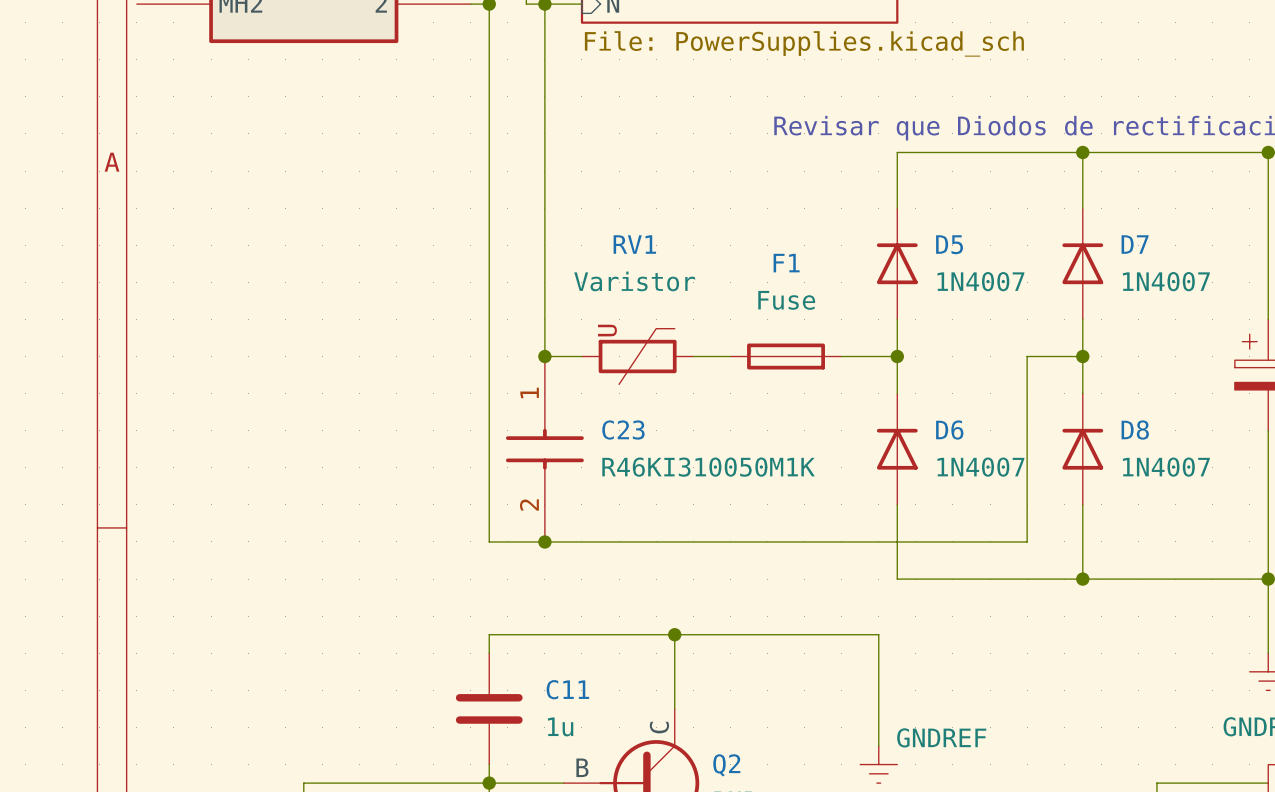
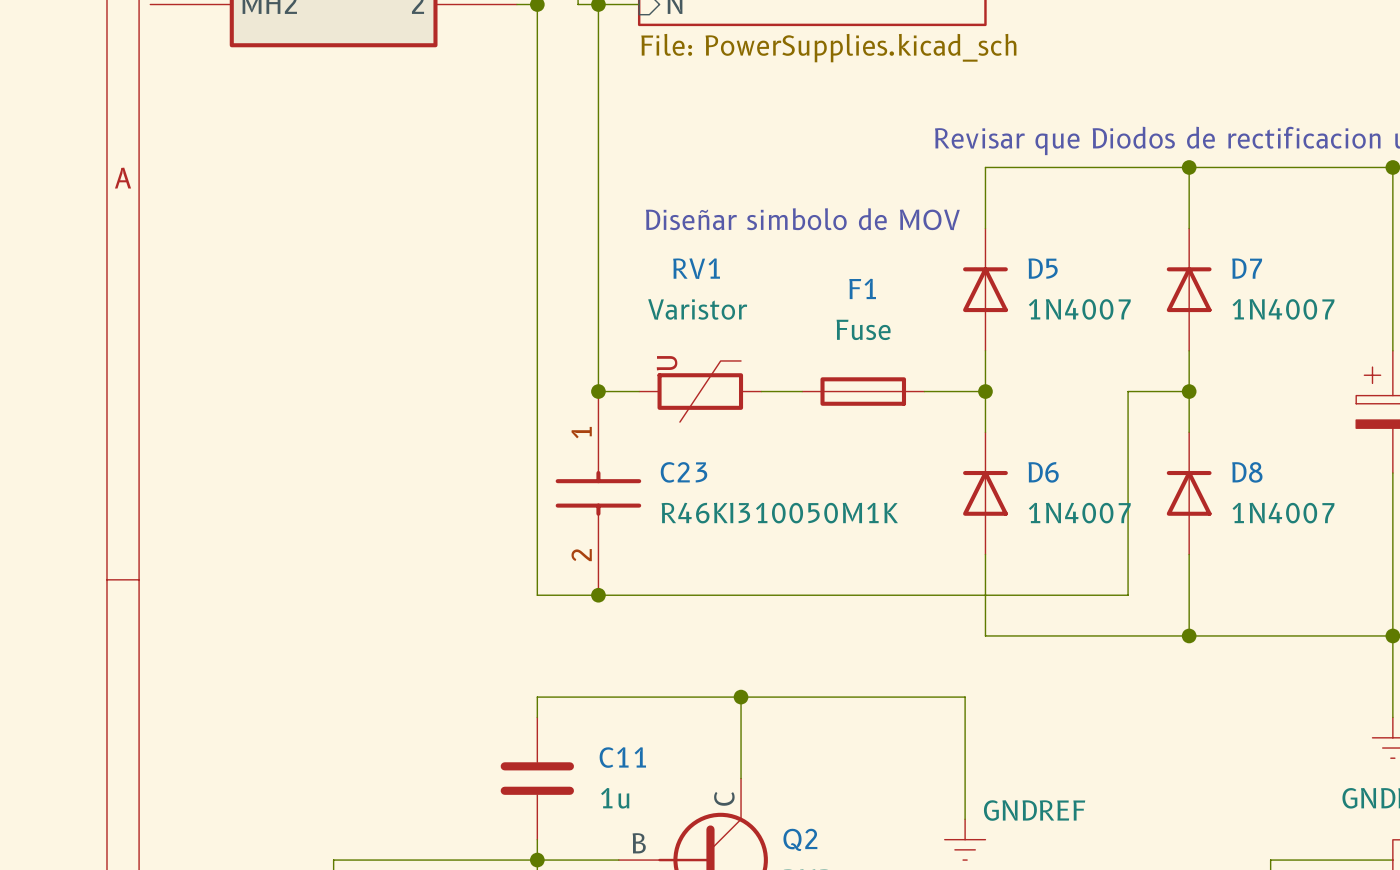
text: none -> Diseñar simbolo de MOV (802, 219)

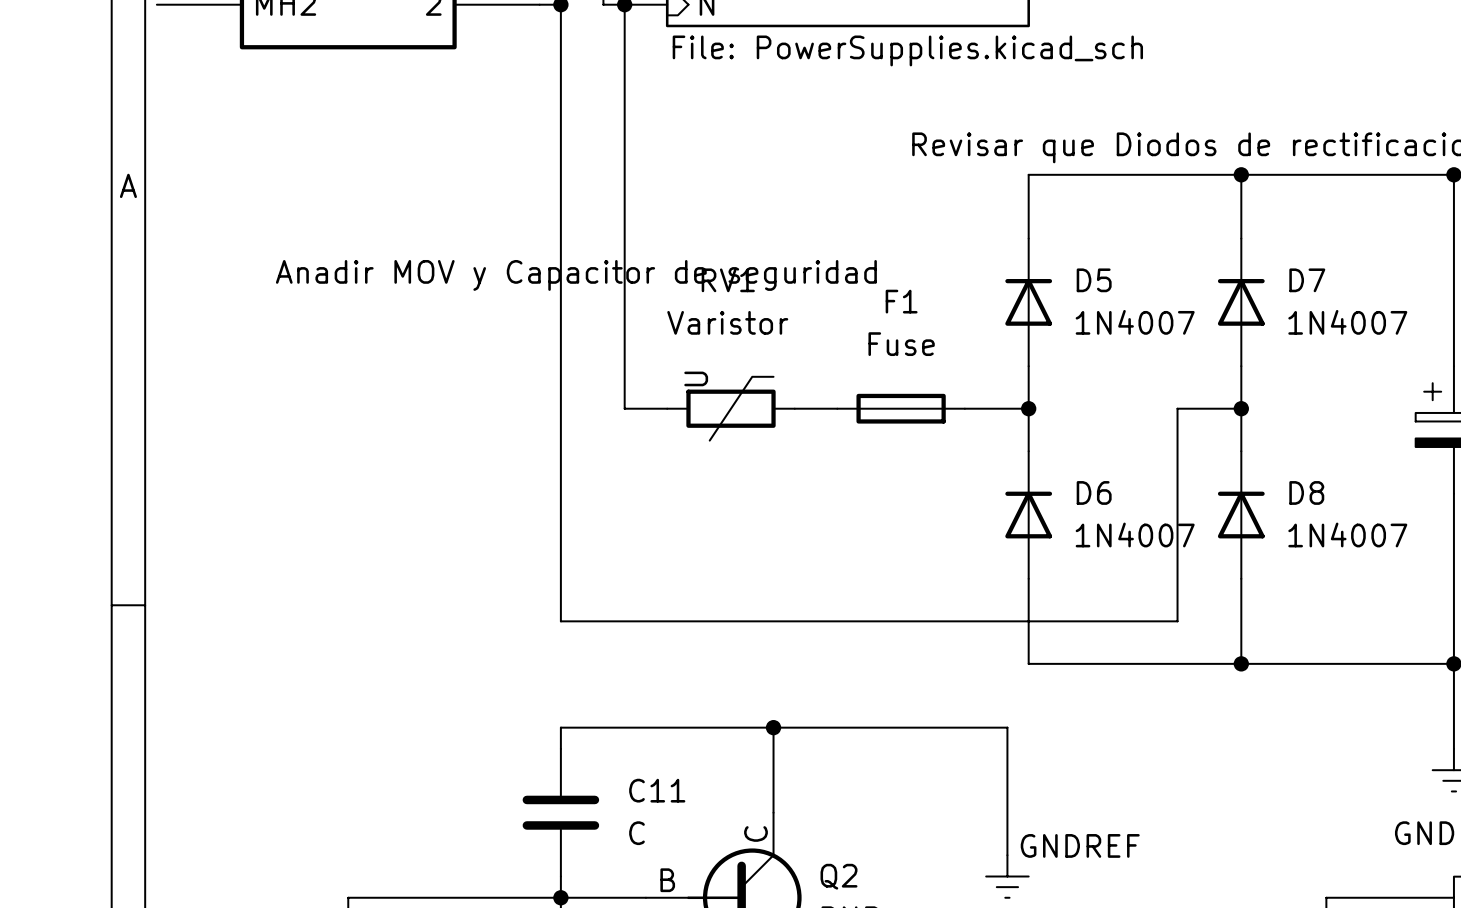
text: Diseñar simbolo de MOV (802, 219) -> none
text: none -> Anadir MOV y Capacitor de seguridad (576, 275)
junction: (598, 391) -> none
C23: R46KI310050M1K (598, 493) -> none
junction: (598, 595) -> none
C11 value: 1u (615, 798) -> C (636, 833)

